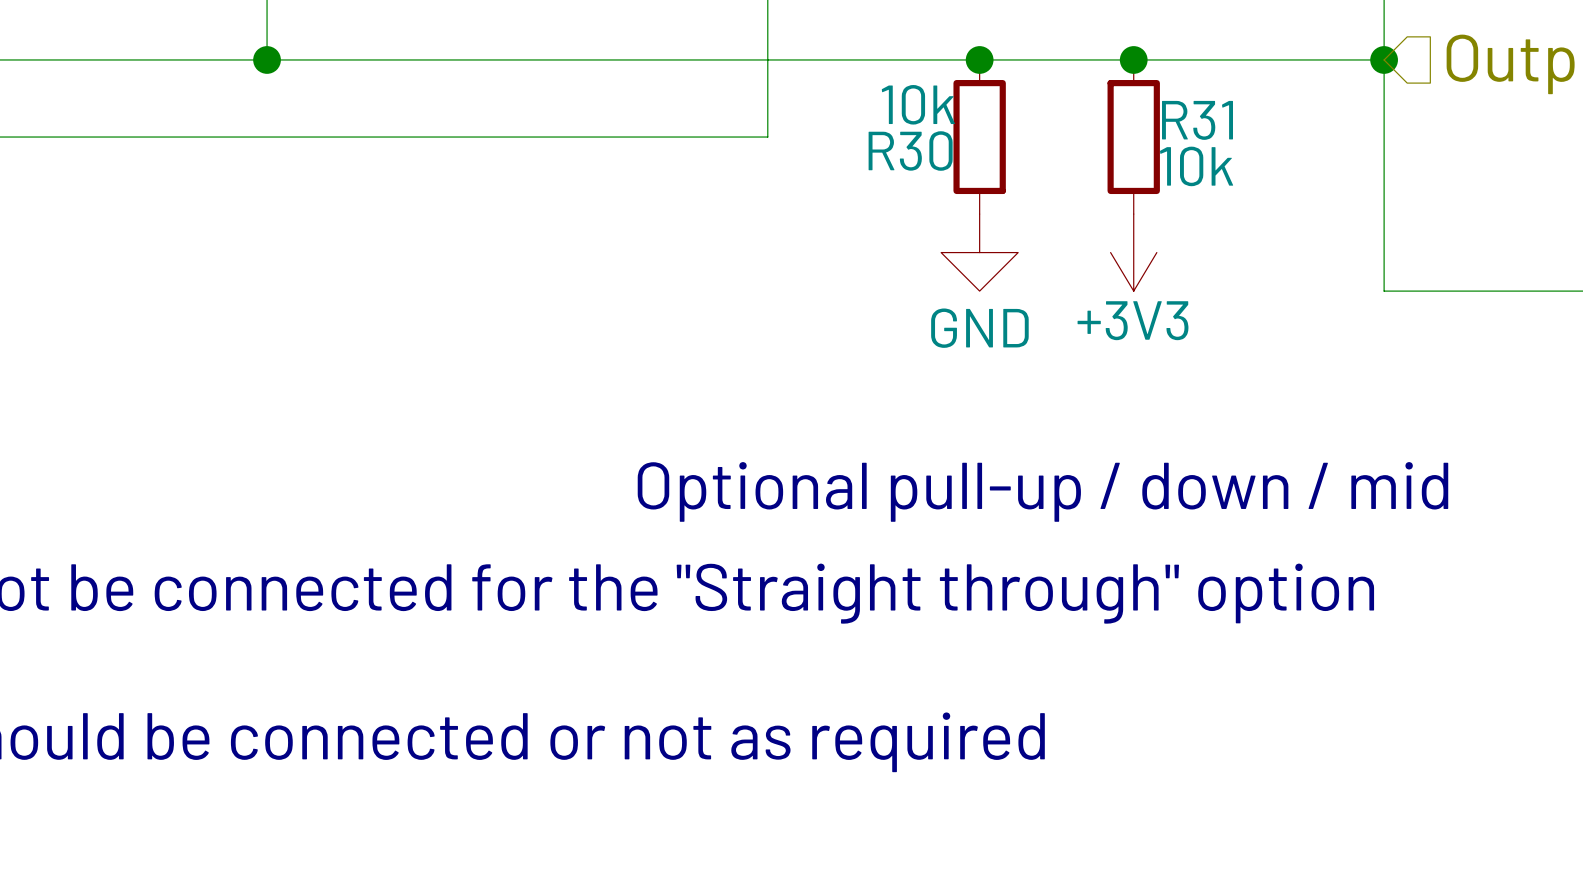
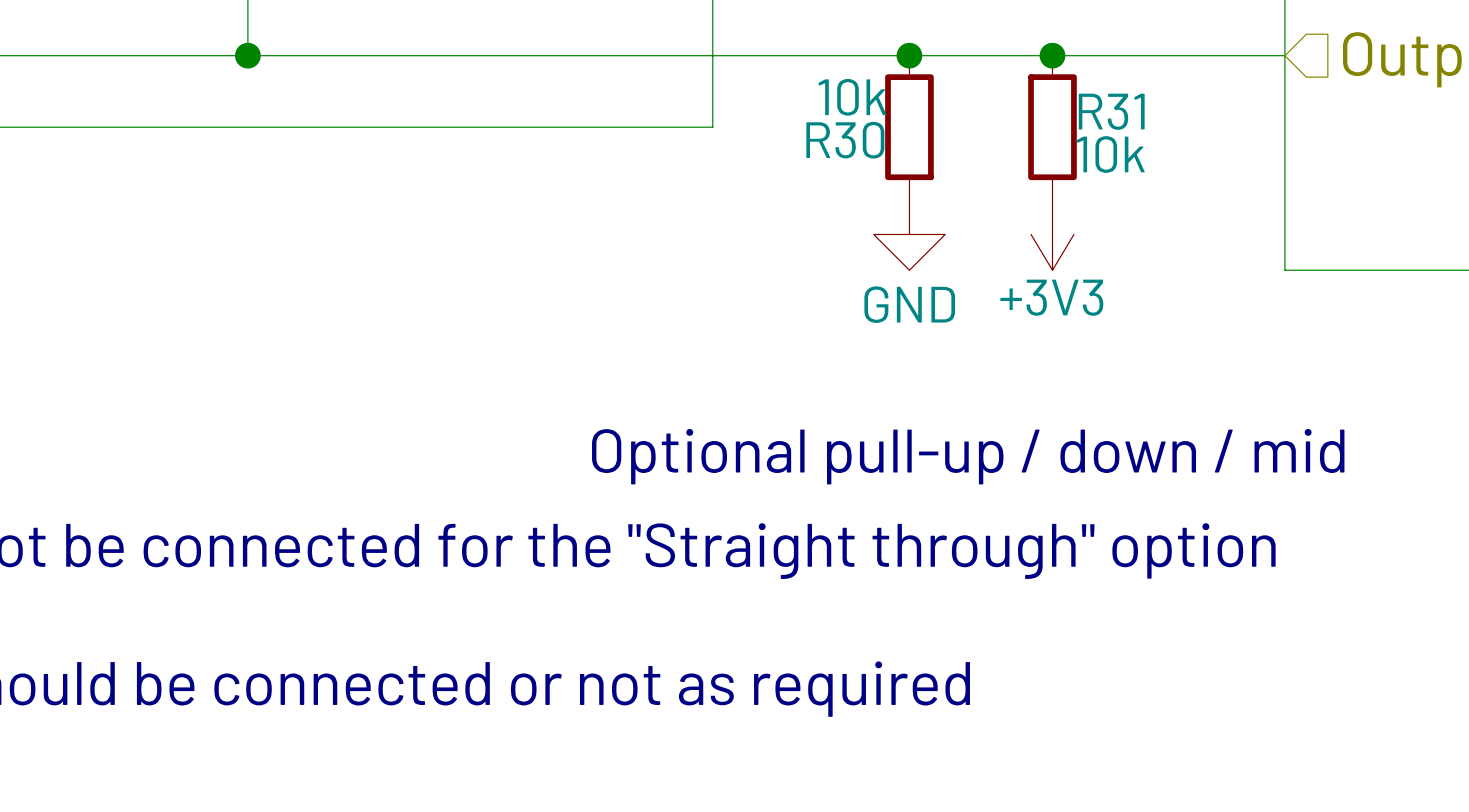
junction: (1384, 59) -> none

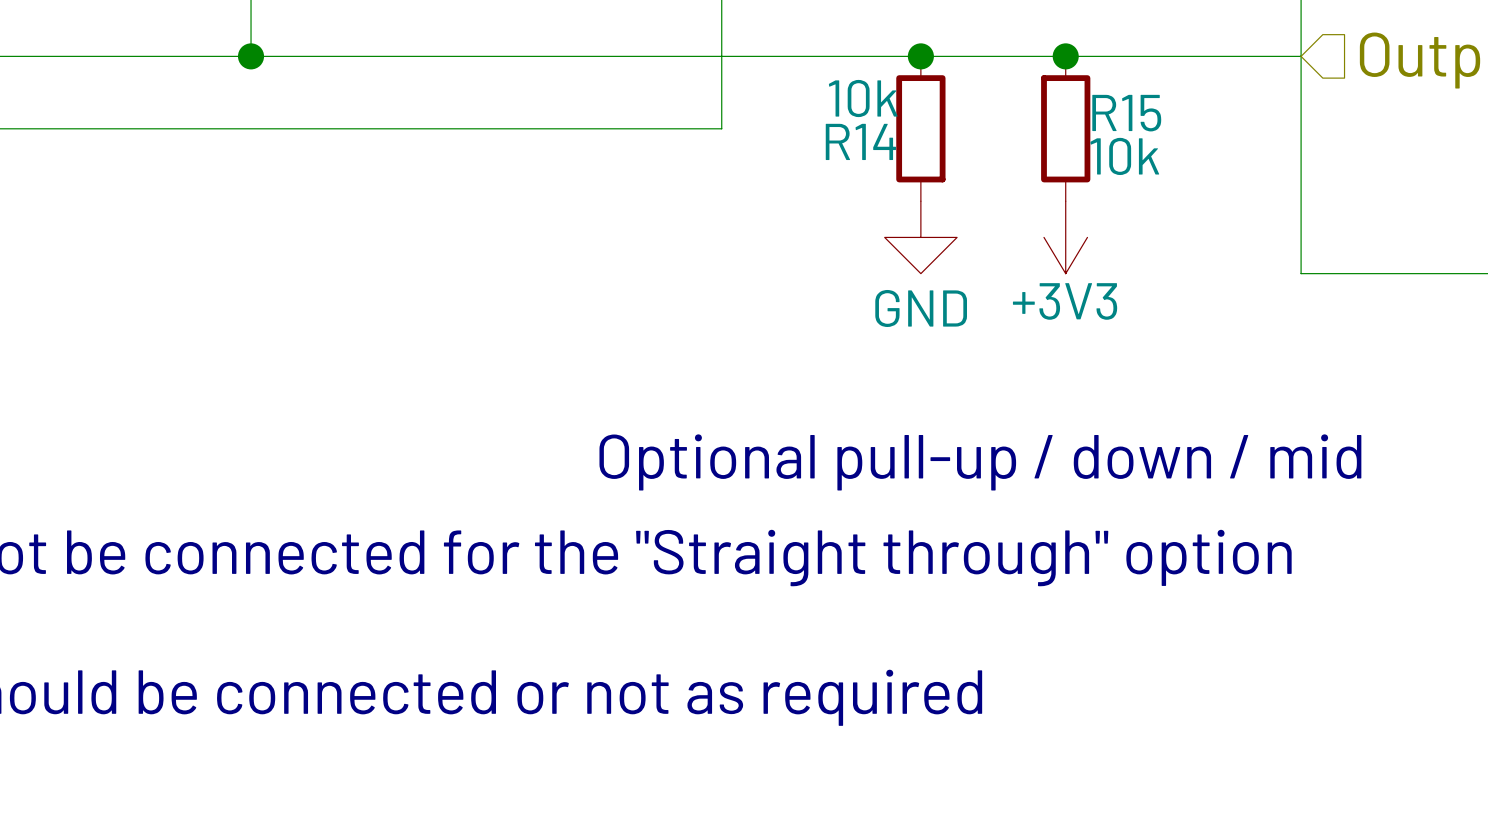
R31 name: R31 (1111, 111) -> R15 (1126, 113)
R30 name: R30 (845, 140) -> R14 (860, 141)

